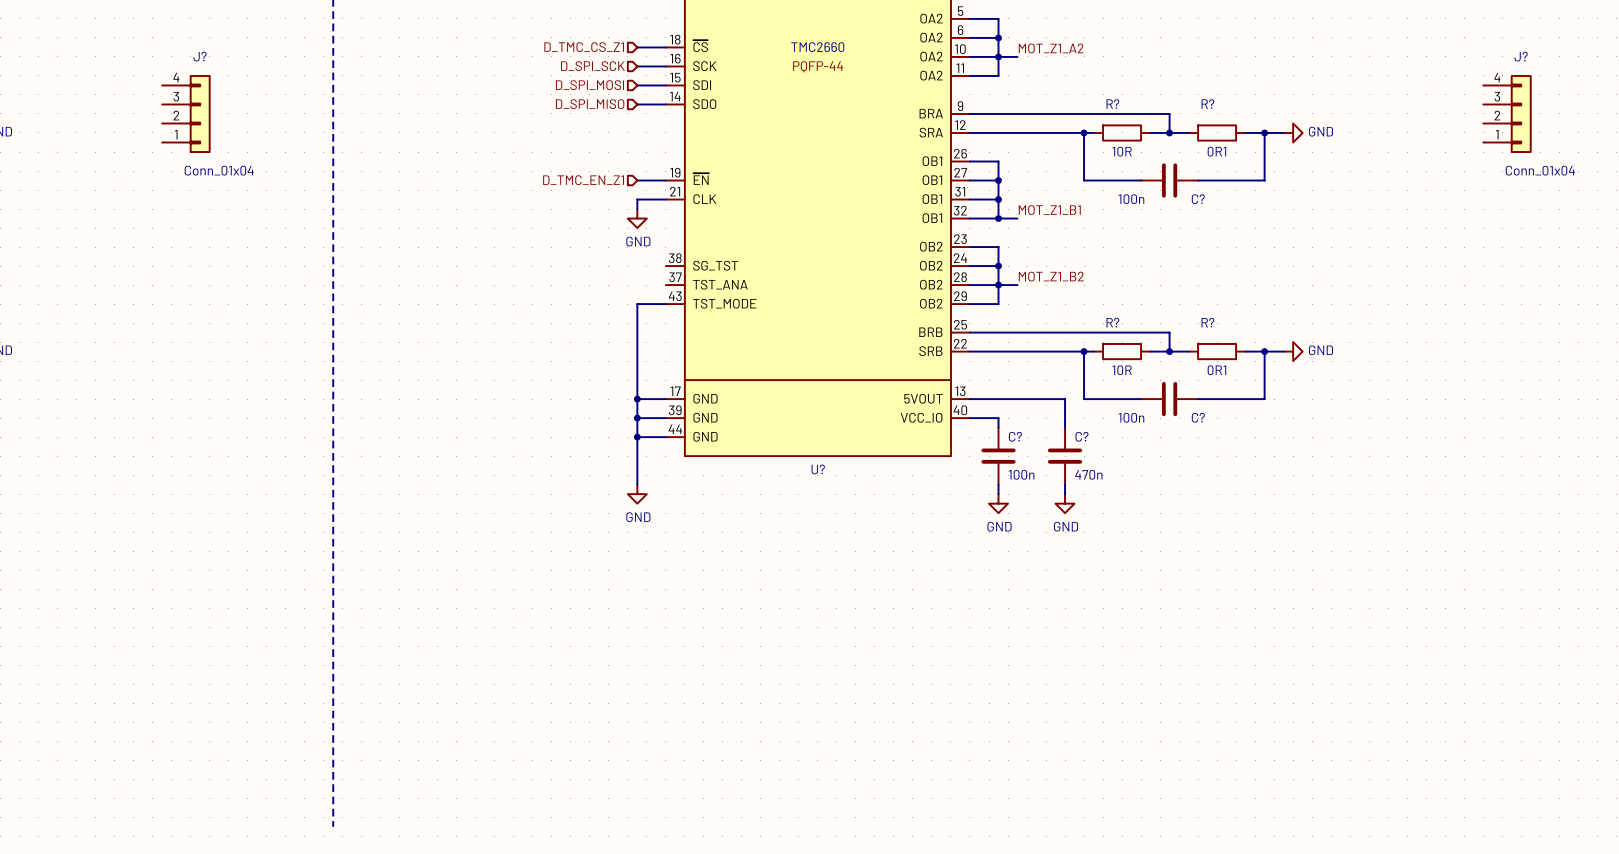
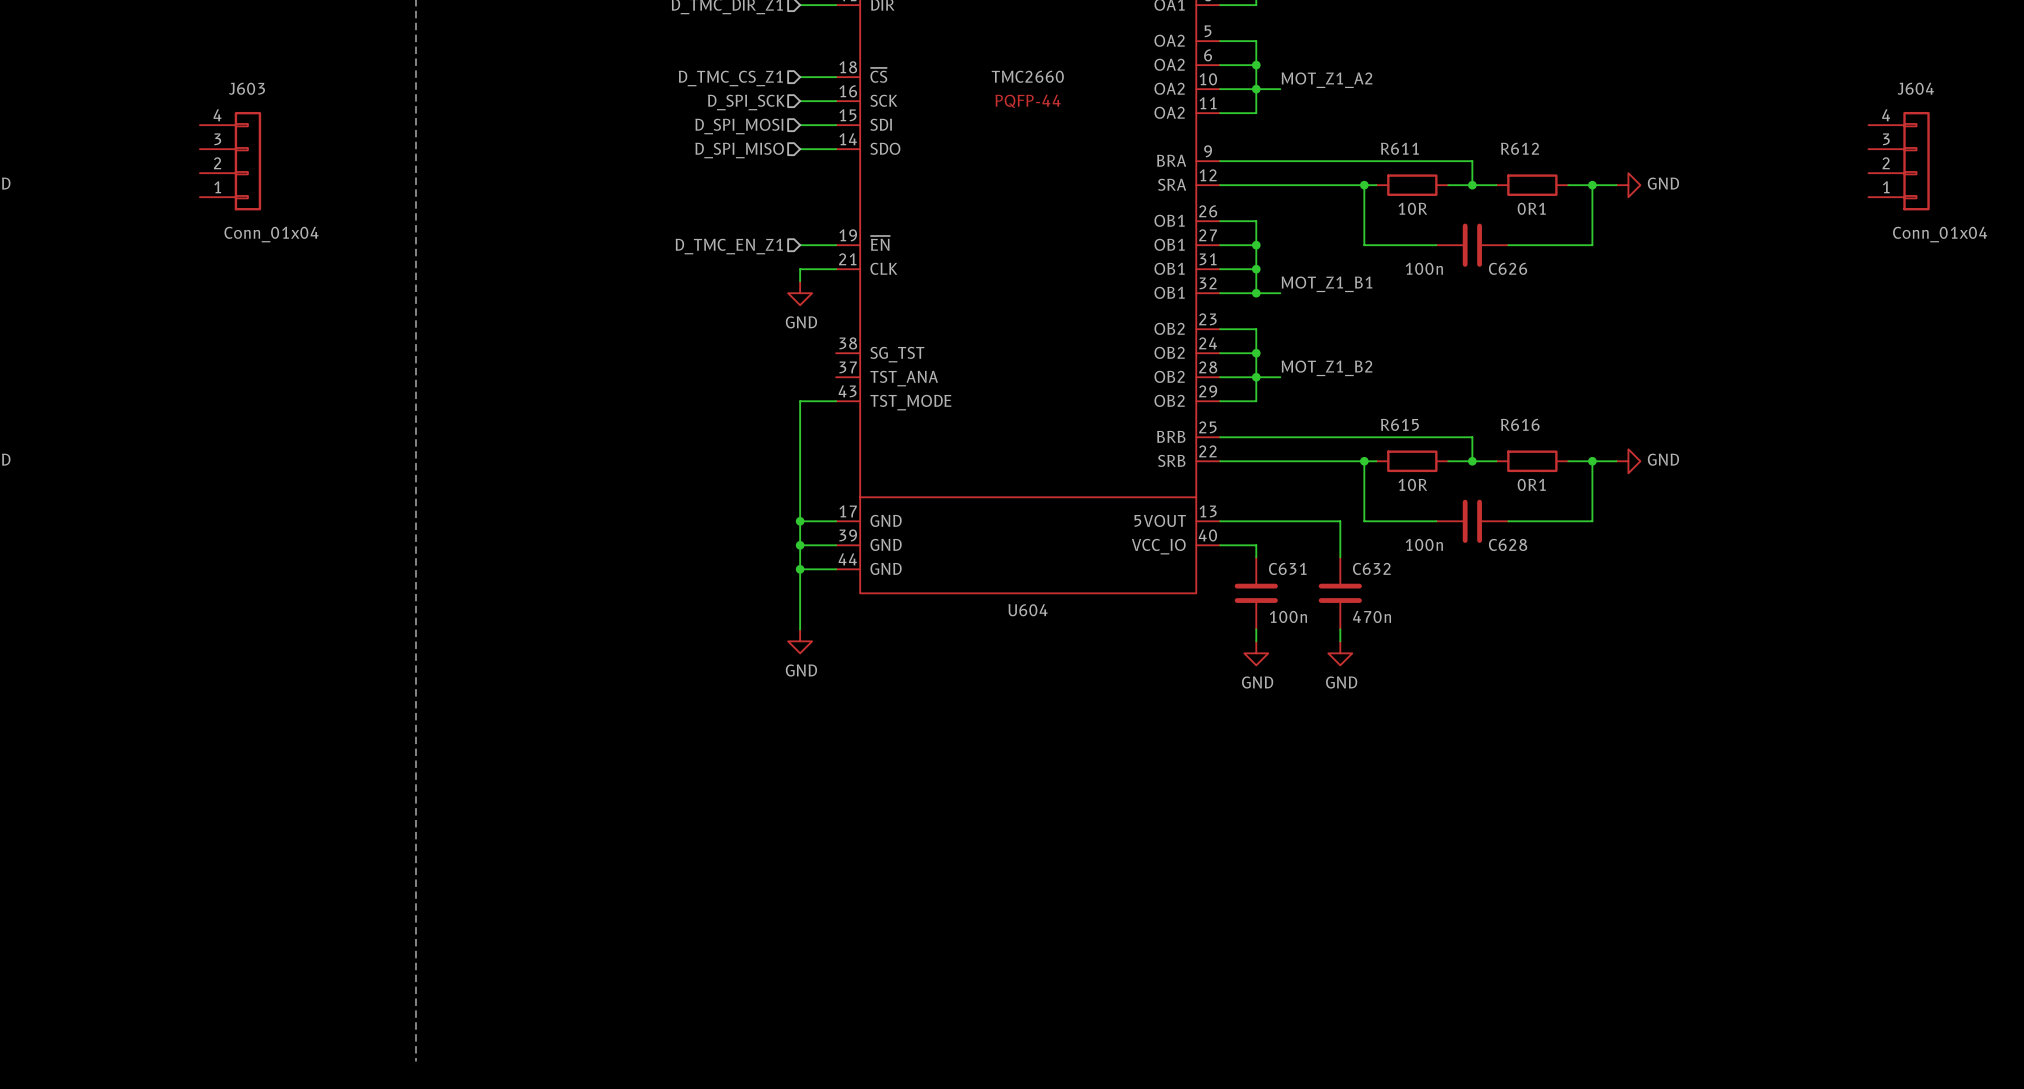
J? name: J? (200, 56) -> J603 (246, 88)
J? name: J? (1521, 56) -> J604 (1915, 88)
R? name: R? (1112, 104) -> R611 (1399, 148)
R? name: R? (1207, 104) -> R612 (1520, 148)
C? name: C? (1198, 199) -> C626 (1508, 268)
R? name: R? (1112, 322) -> R615 (1399, 424)
R? name: R? (1207, 322) -> R616 (1520, 424)
C? name: C? (1198, 417) -> C628 (1508, 544)
C? name: C? (1015, 436) -> C631 (1287, 568)
C? name: C? (1081, 436) -> C632 (1371, 568)
U? name: U? (818, 469) -> U604 (1028, 610)

